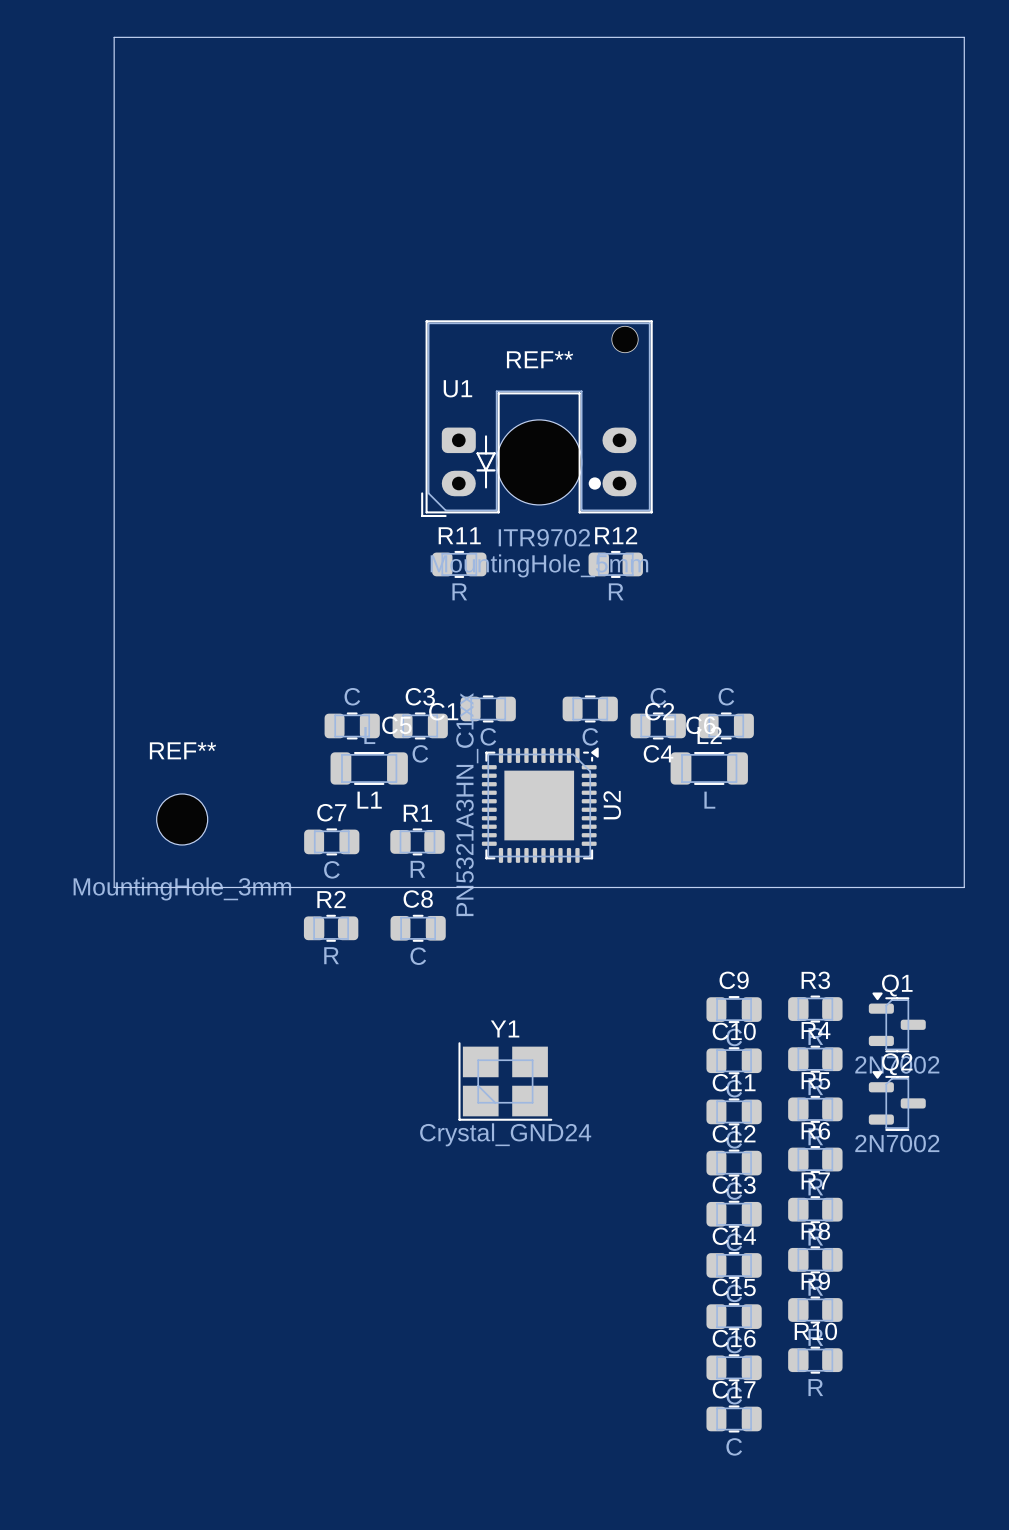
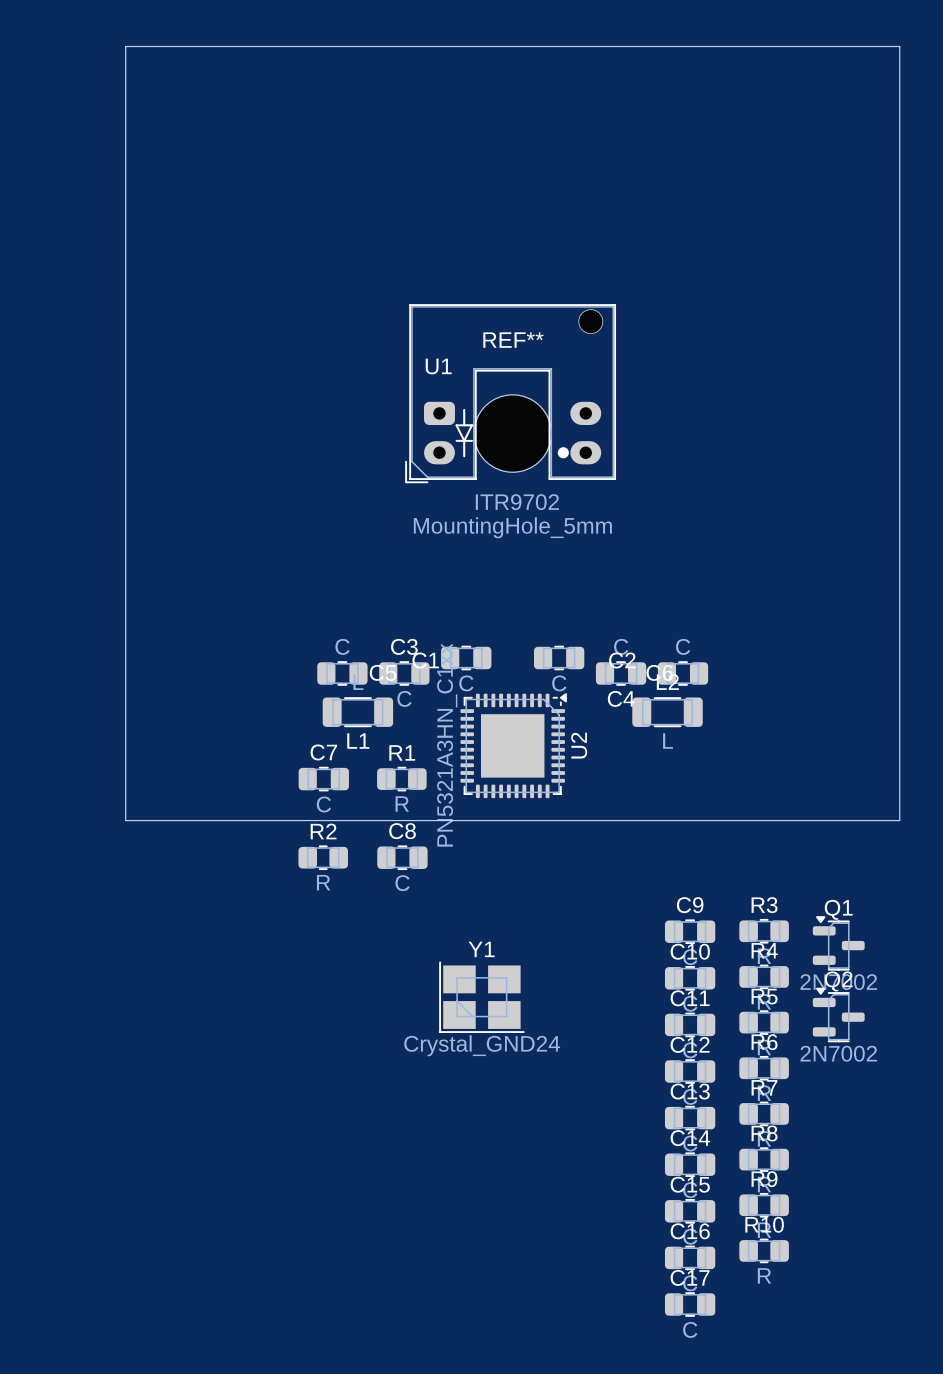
R11: R (459, 564) -> none
R12: R (615, 564) -> none
REF**: MountingHole_3mm (182, 819) -> none

